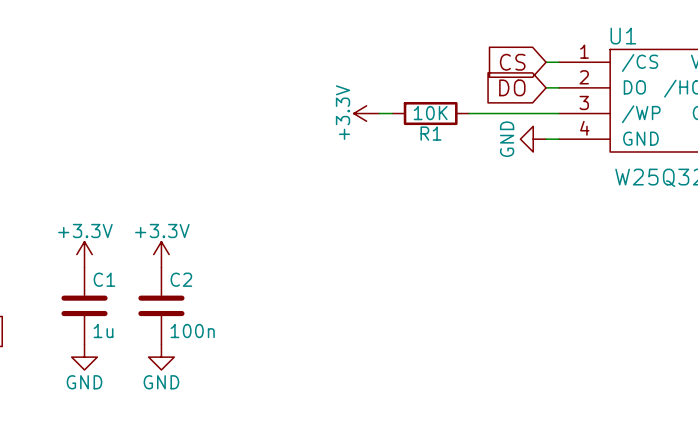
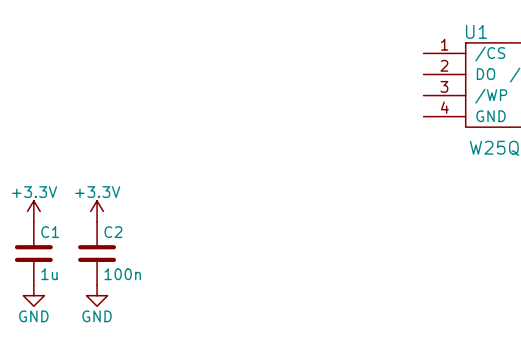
global label: CS (512, 62) -> none
wire: (546, 62) (558, 62) -> none
global label: DO (512, 87) -> none
wire: (546, 87) (558, 87) -> none
power symbol: +3.3V (366, 113) -> none
wire: (379, 113) (392, 113) -> none
R1: 10K (430, 113) -> none
wire: (469, 113) (558, 113) -> none
power symbol: GND (533, 139) -> none
wire: (546, 139) (558, 139) -> none

